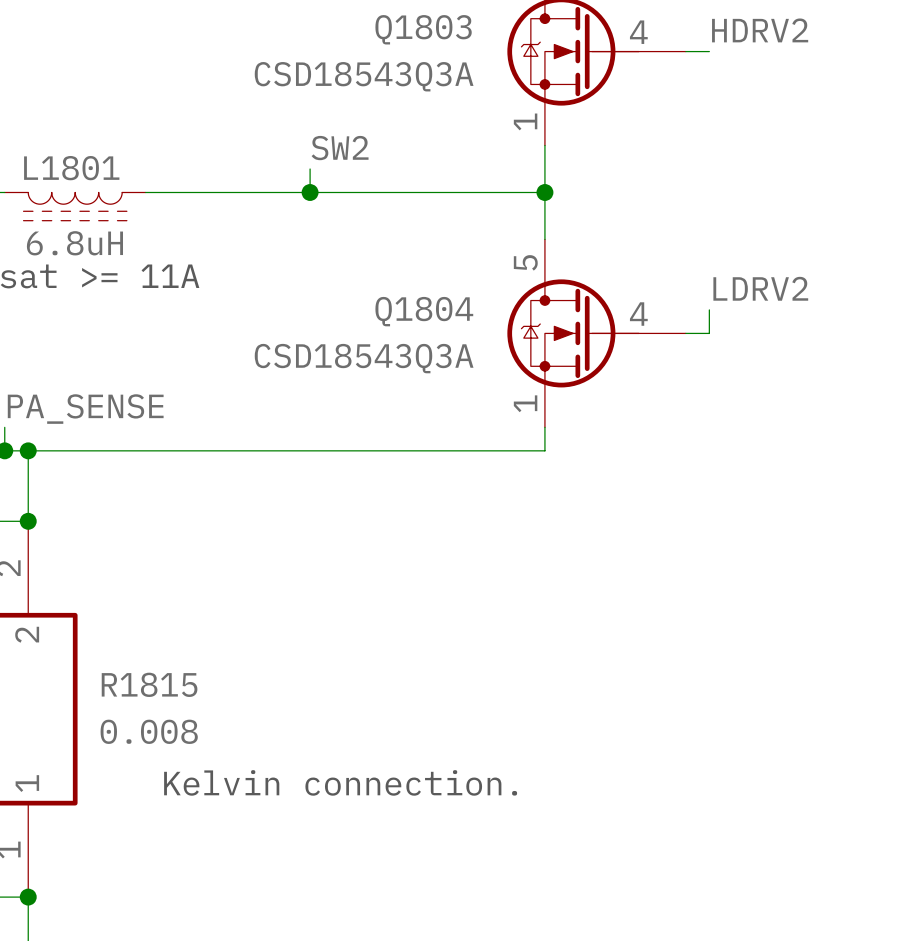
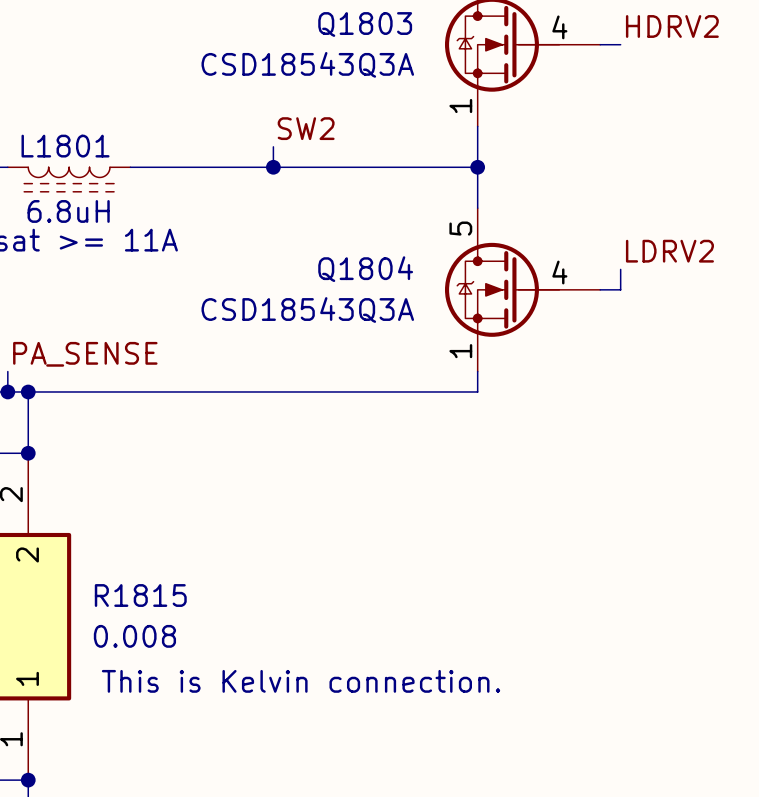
text: Kelvin connection. (340, 782) -> This is Kelvin connection. (301, 681)

